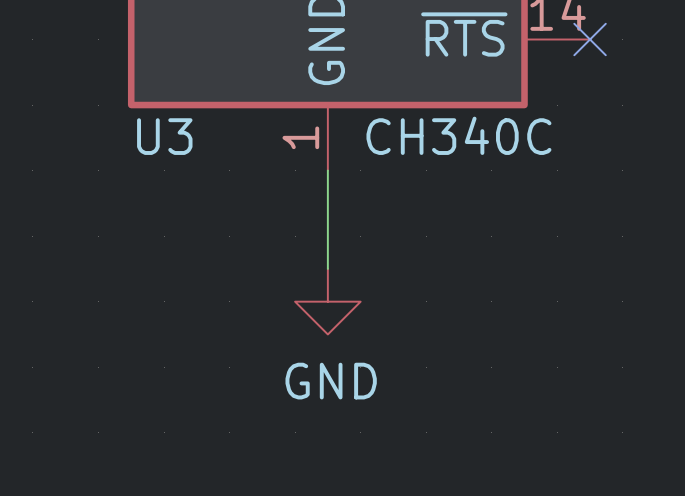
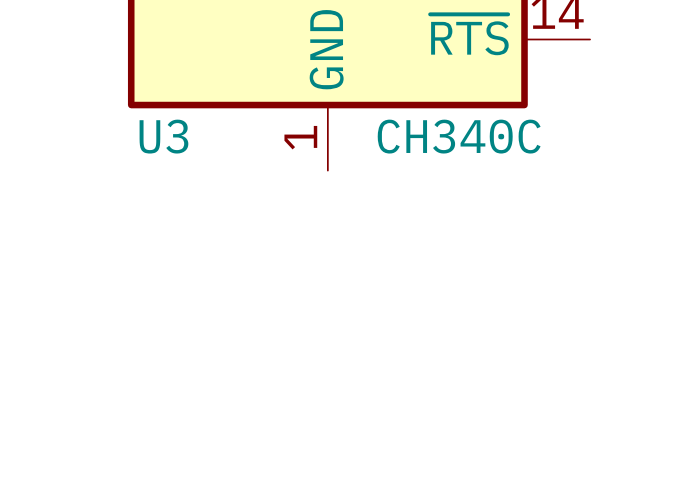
no-connect mark: (590, 39) -> none
wire: (327, 170) (327, 268) -> none
power symbol: GND (327, 301) -> none

